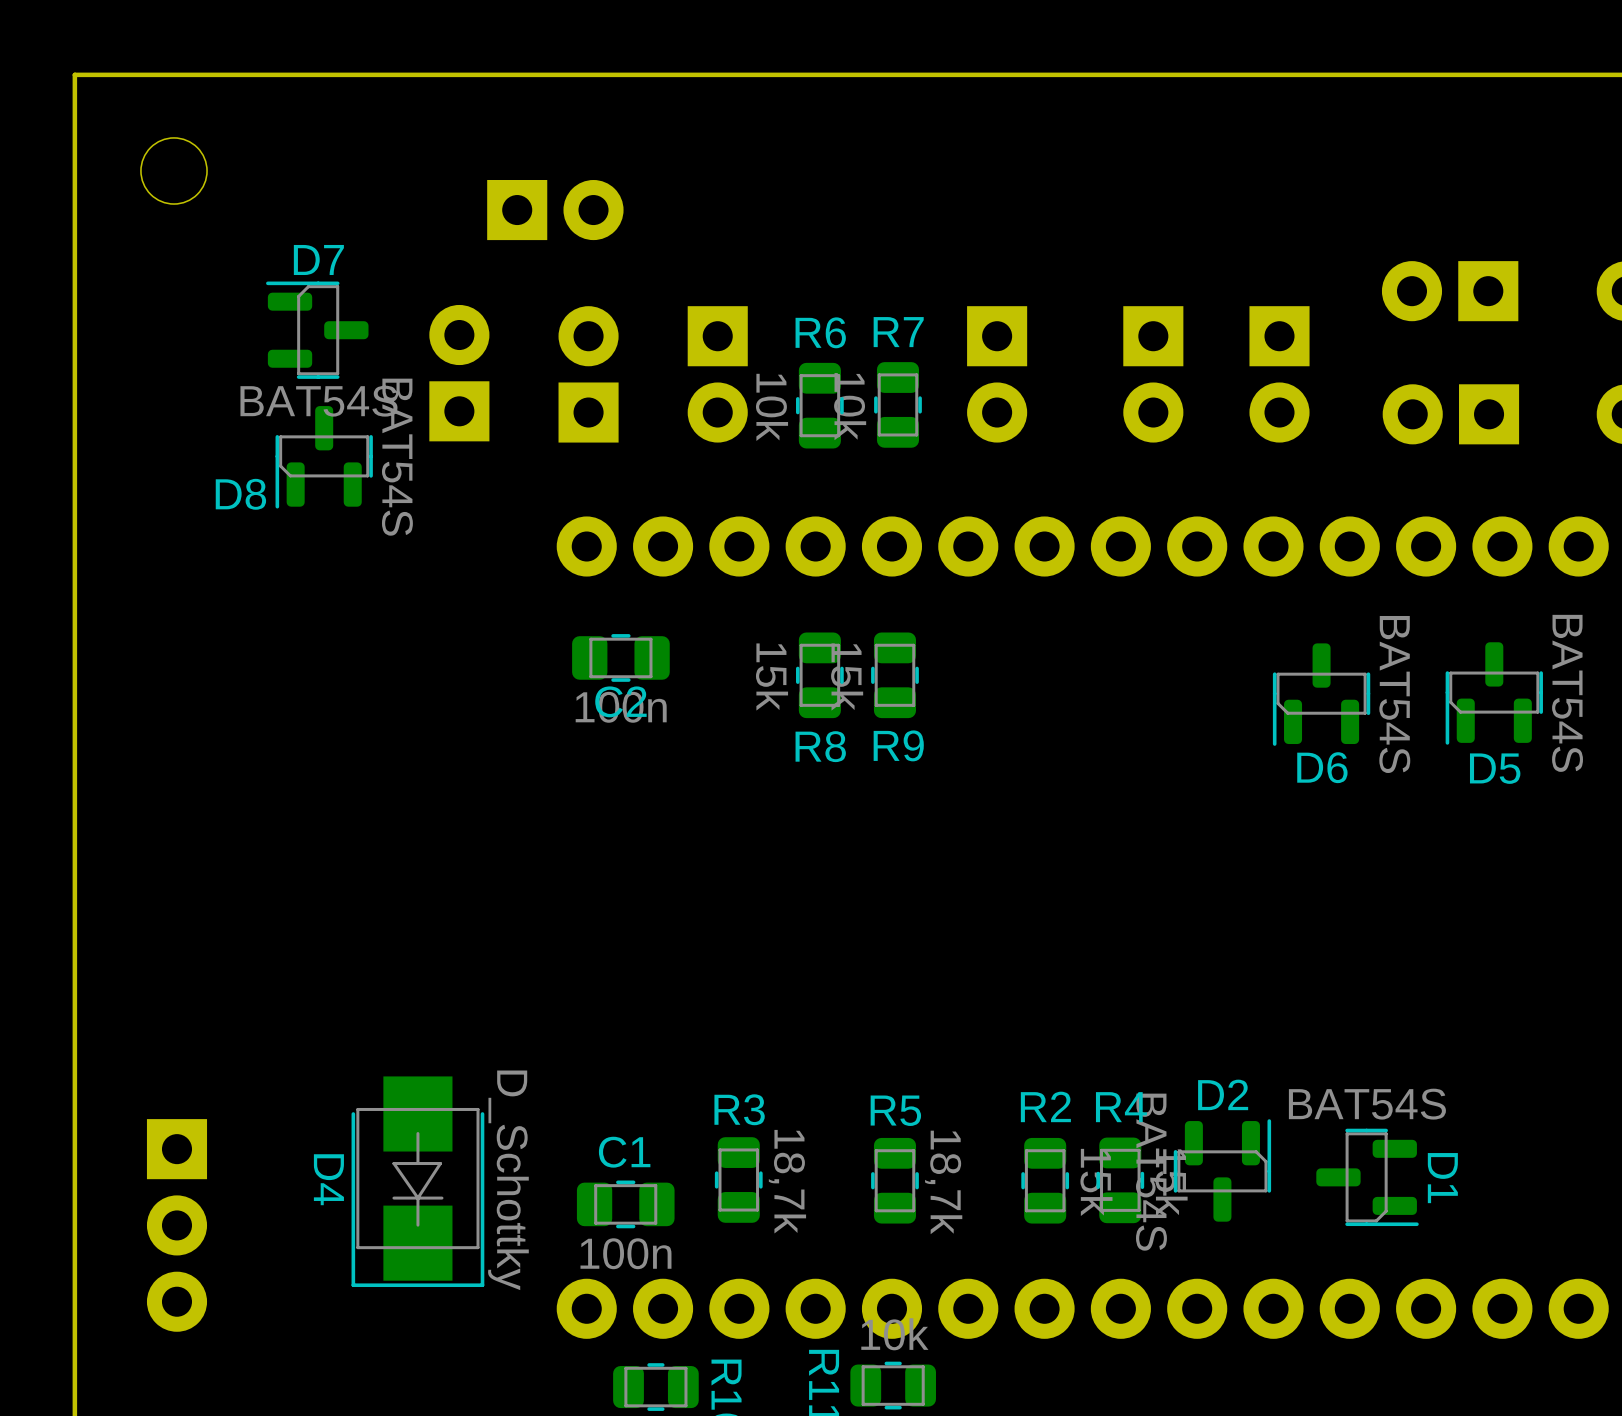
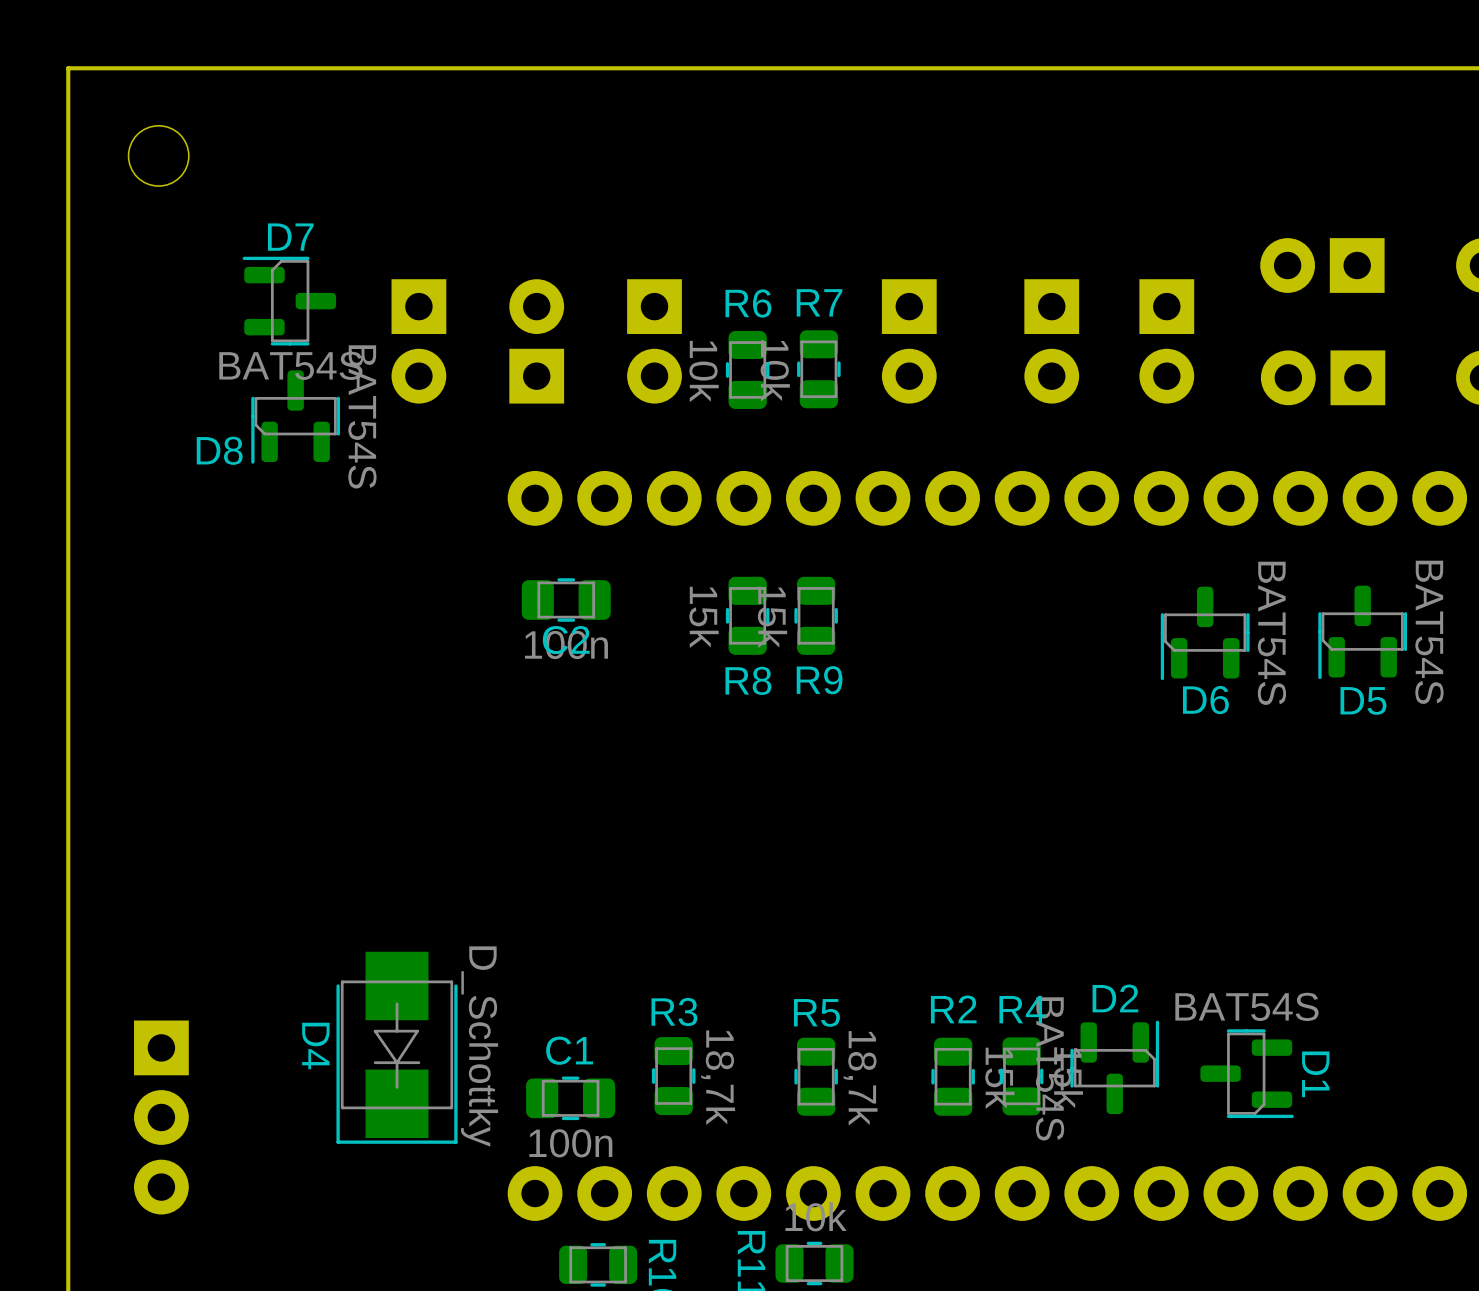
part: (555, 210) -> none
part rotation: 0° (459, 373) -> 180° (418, 341)
D4 position: (417, 1181) -> (397, 1047)

